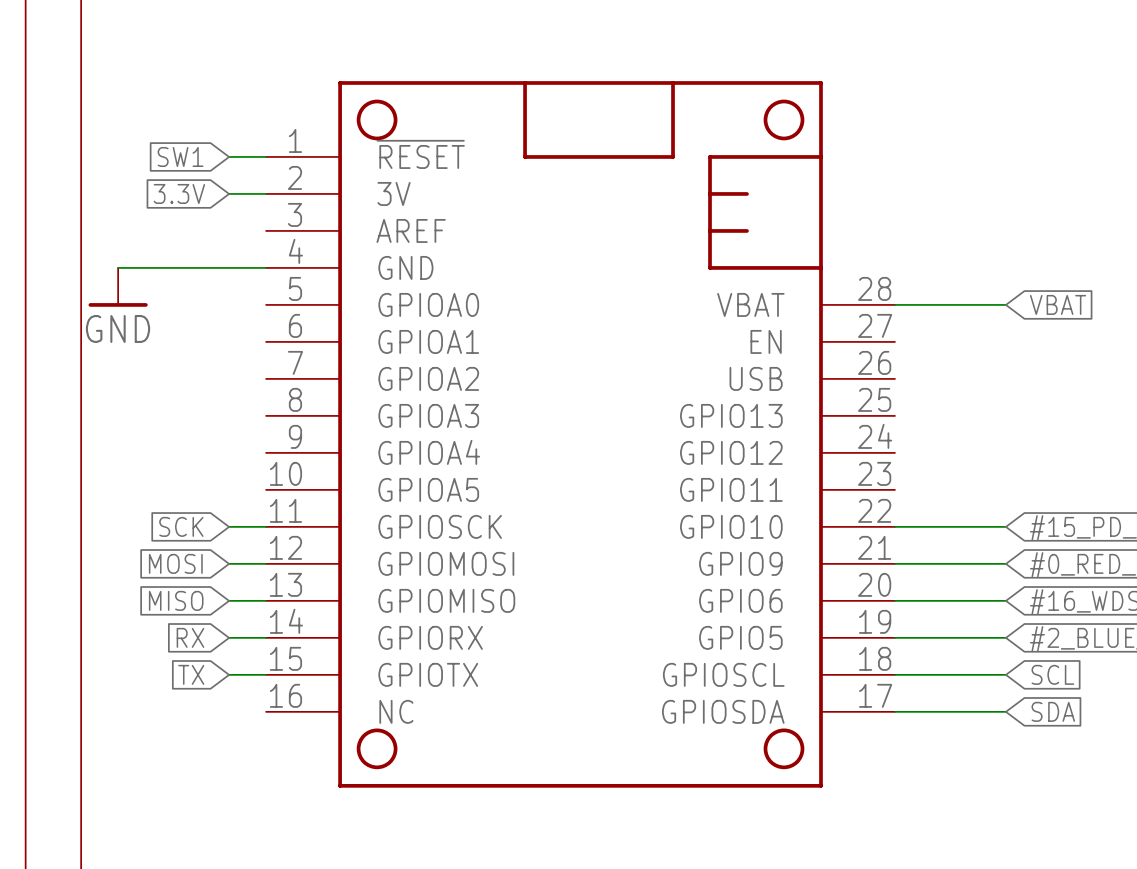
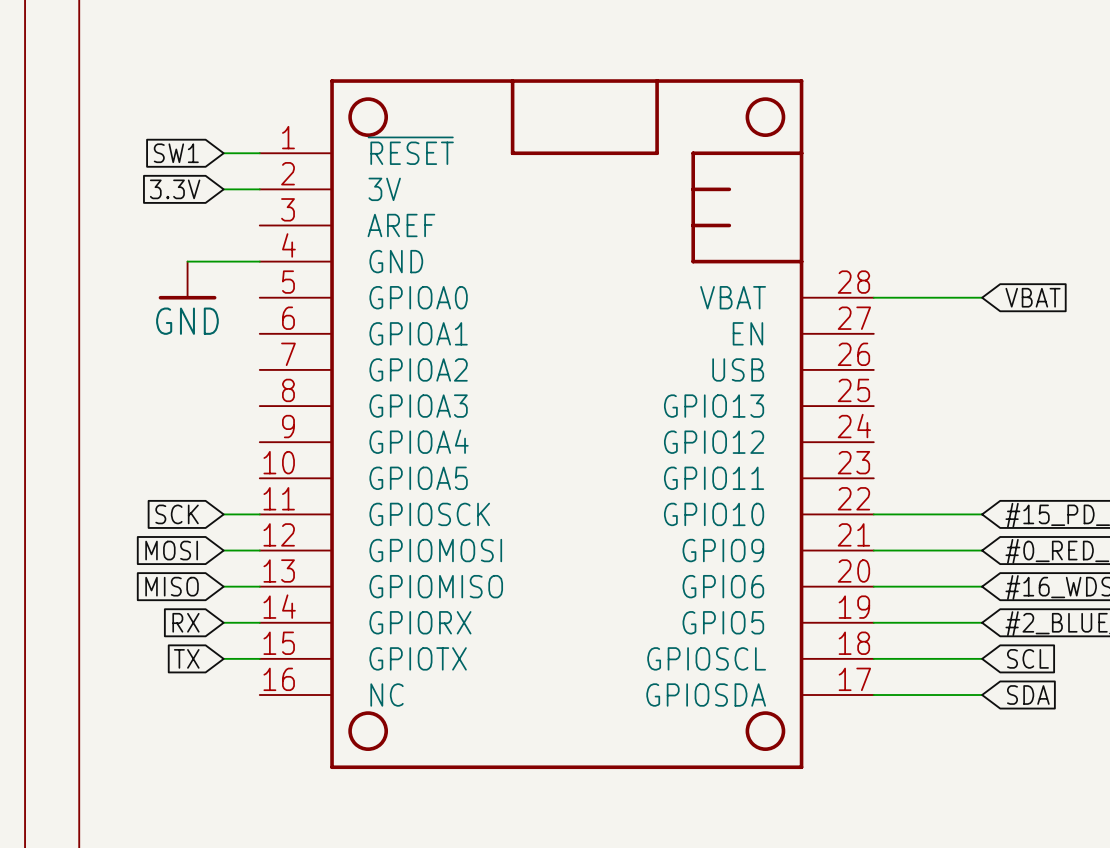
wire: (118, 267) (192, 267) -> none
power symbol position: GND (118, 287) -> GND (187, 280)

